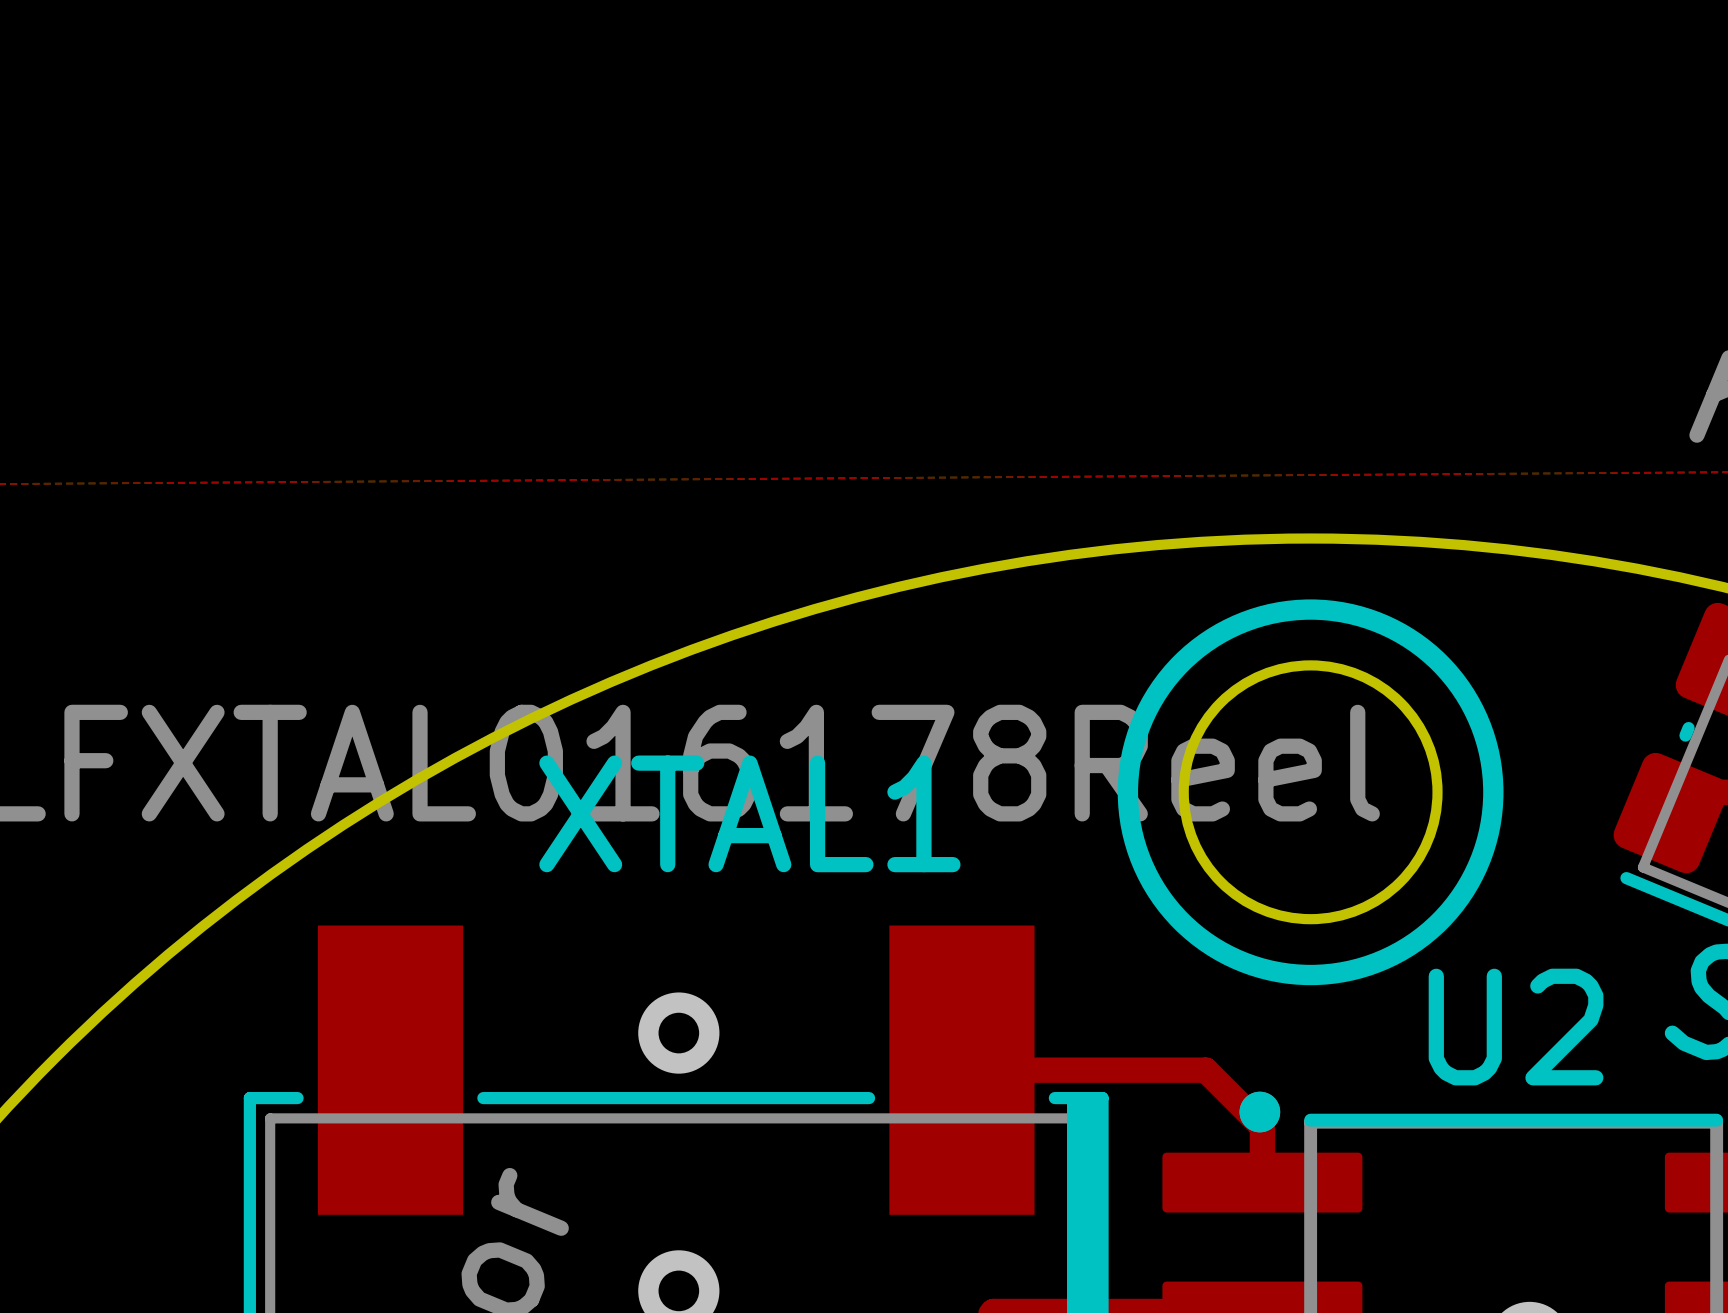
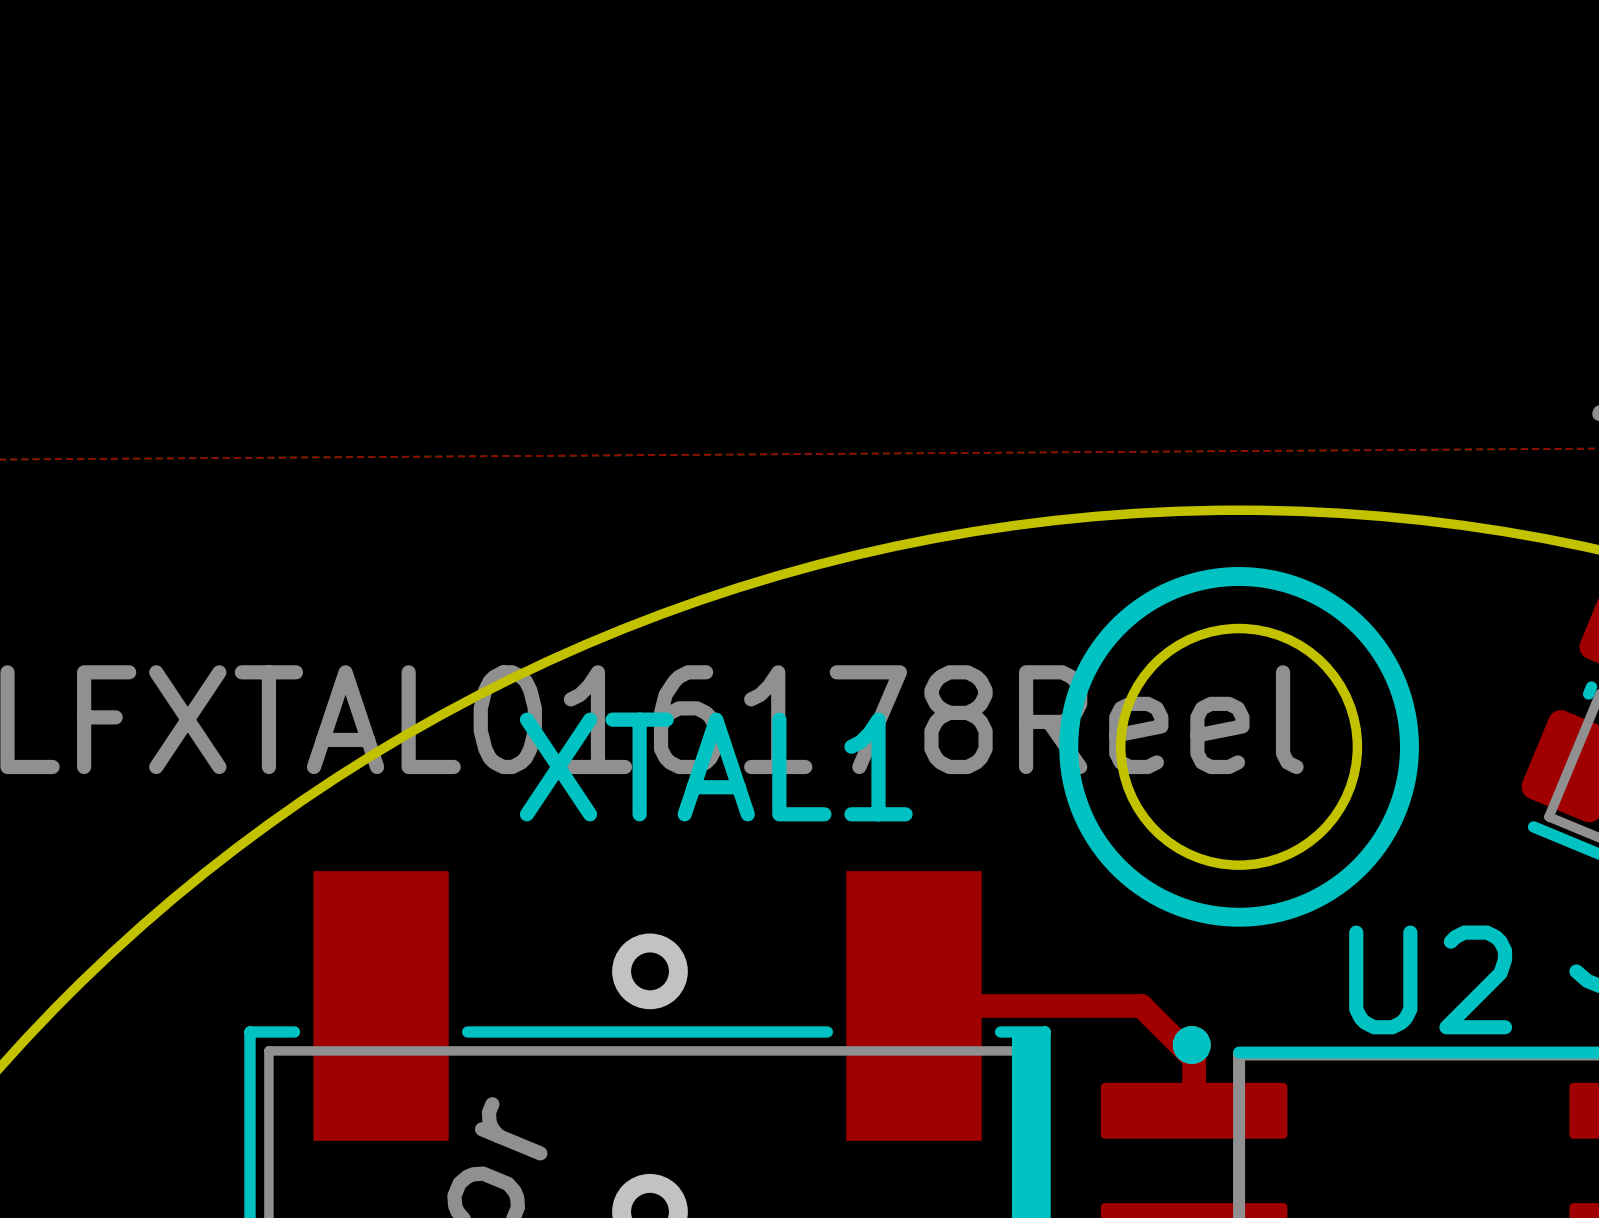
U2 name position: U2 (1516, 1027) -> U2 (1430, 979)

